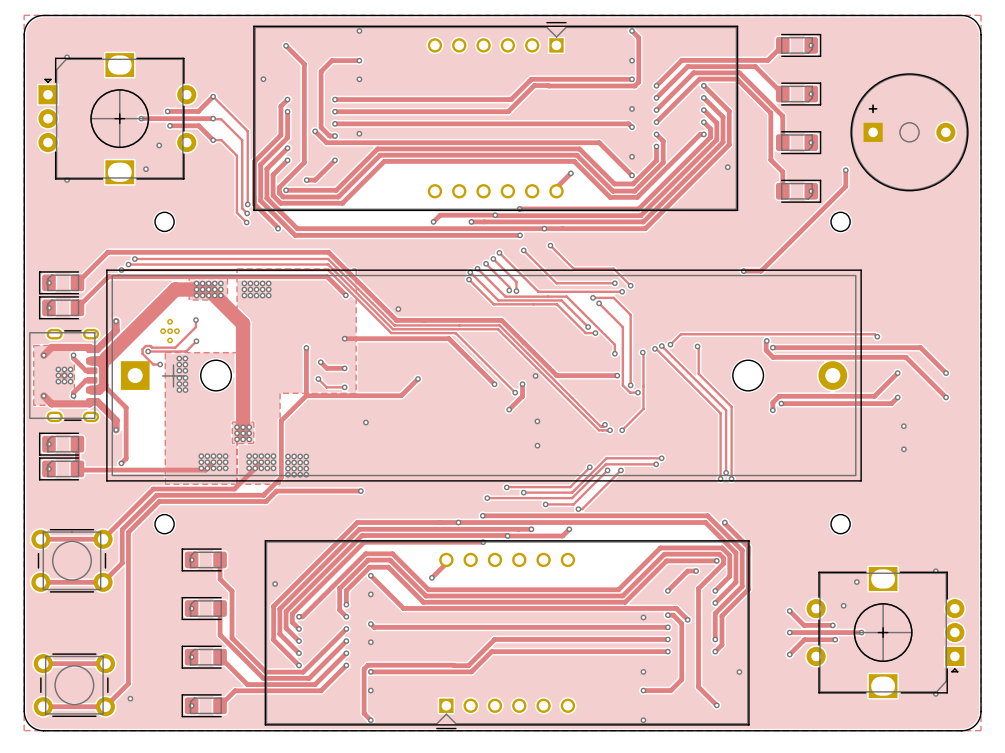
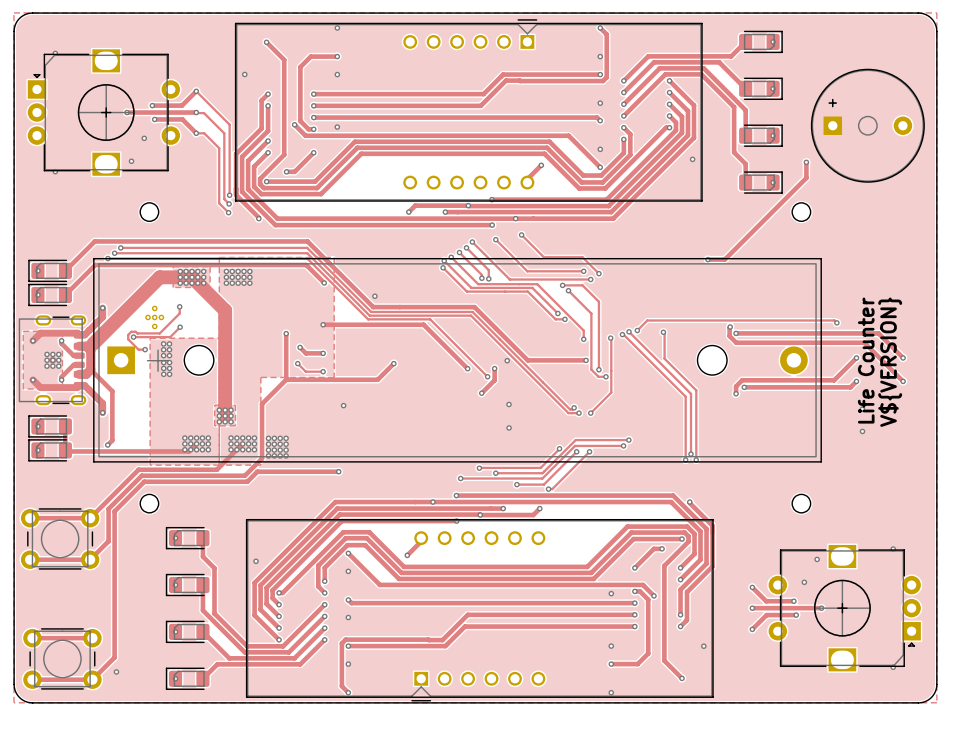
text: none -> Life Counter (866, 360)
text: none -> V${VERSION} (890, 362)

